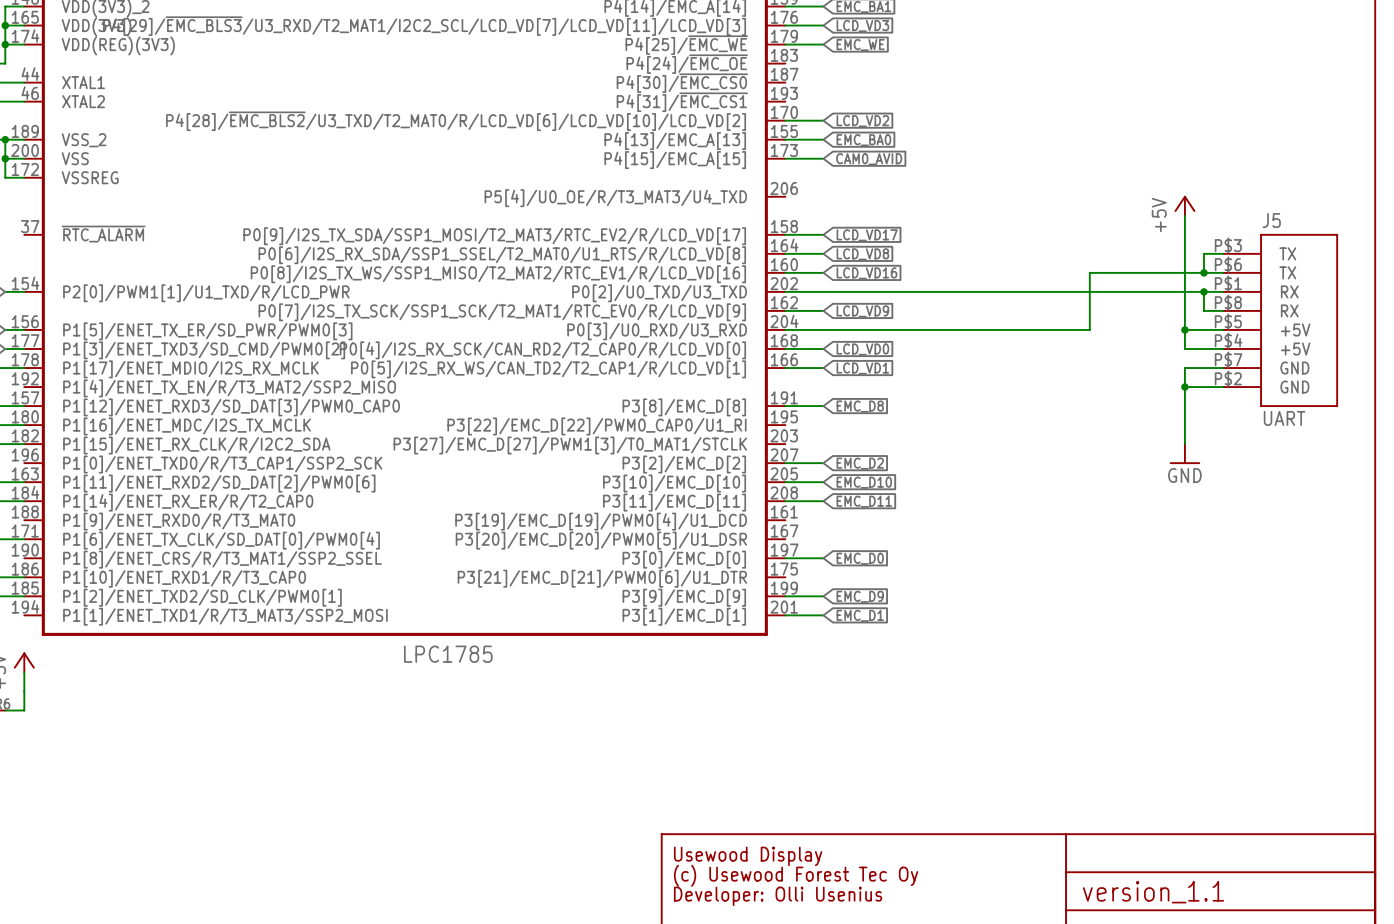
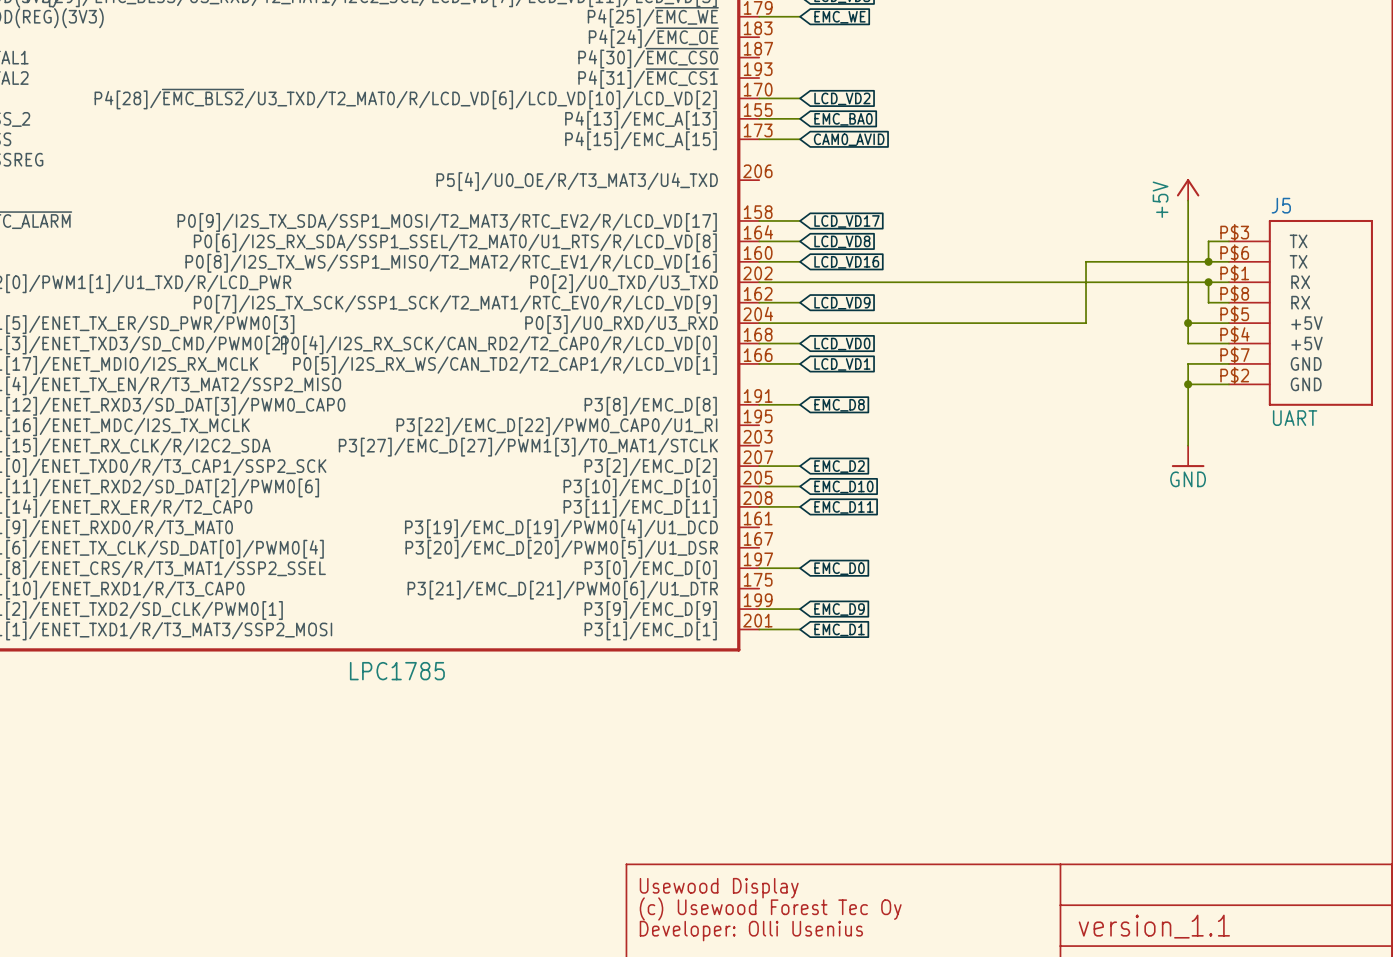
J5 symbol: [1223, 233, 1339, 408] -> [1228, 219, 1373, 406]

